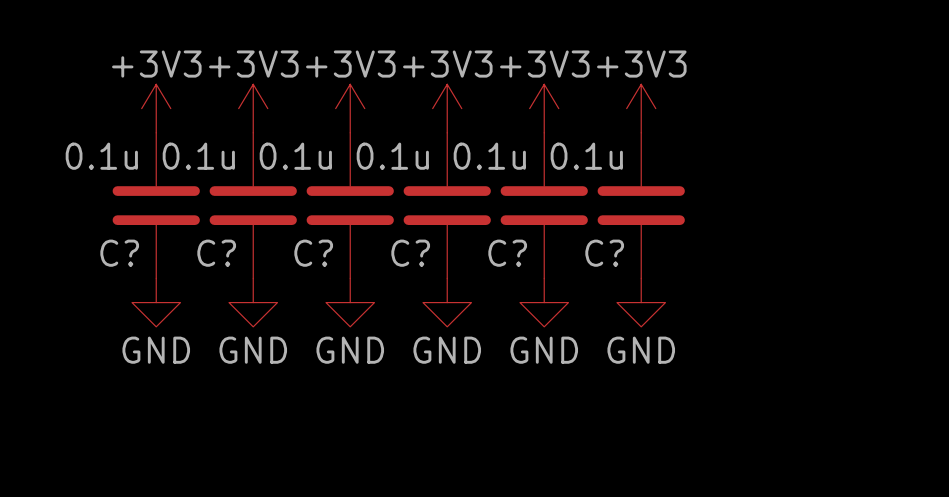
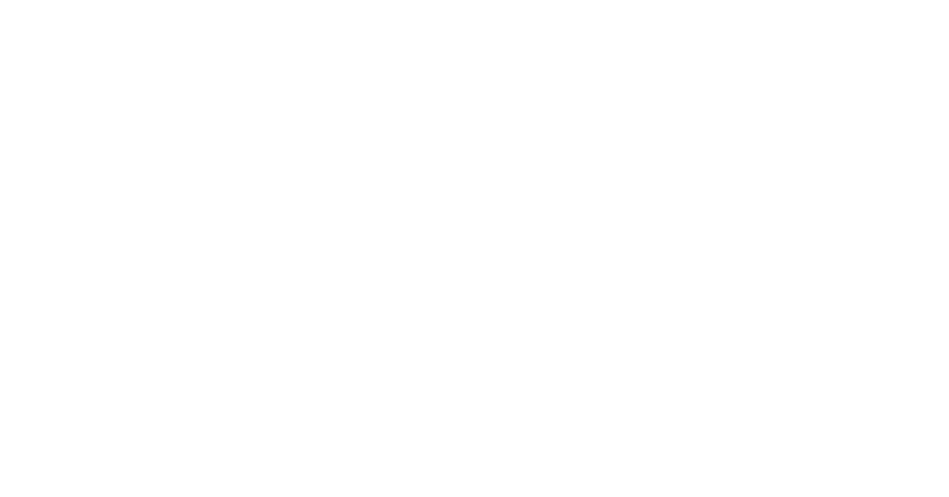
power symbol: +3V3 (156, 108) -> none
power symbol: +3V3 (253, 108) -> none
power symbol: +3V3 (350, 108) -> none
power symbol: +3V3 (447, 108) -> none
power symbol: +3V3 (544, 108) -> none
power symbol: +3V3 (641, 108) -> none
C?: 0.1u (156, 205) -> none
C?: 0.1u (253, 205) -> none
C?: 0.1u (350, 205) -> none
C?: 0.1u (447, 205) -> none
C?: 0.1u (544, 205) -> none
C?: 0.1u (641, 205) -> none
power symbol: GND (156, 302) -> none
power symbol: GND (253, 302) -> none
power symbol: GND (350, 302) -> none
power symbol: GND (447, 302) -> none
power symbol: GND (544, 302) -> none
power symbol: GND (641, 302) -> none

